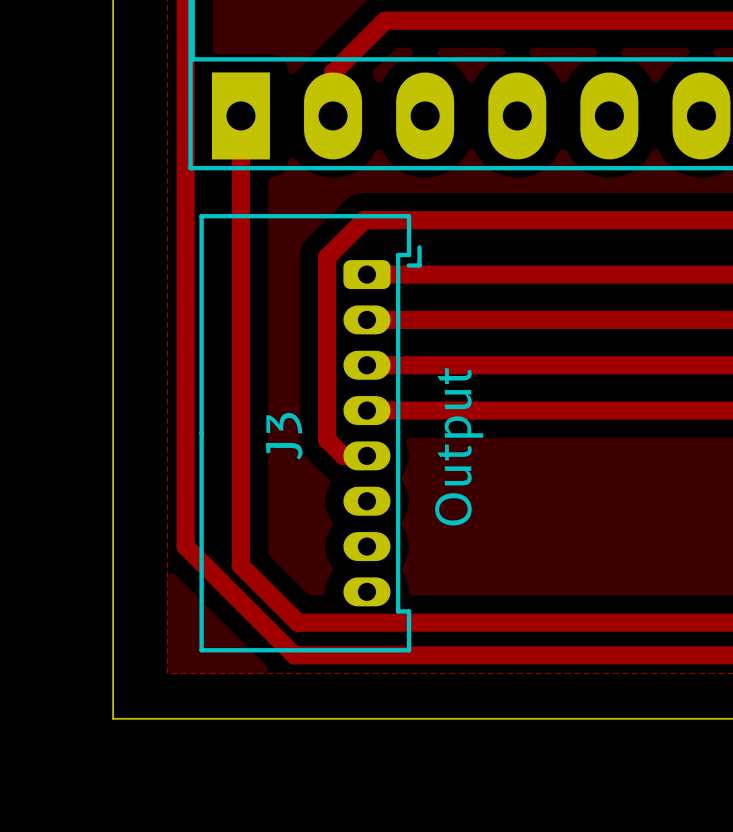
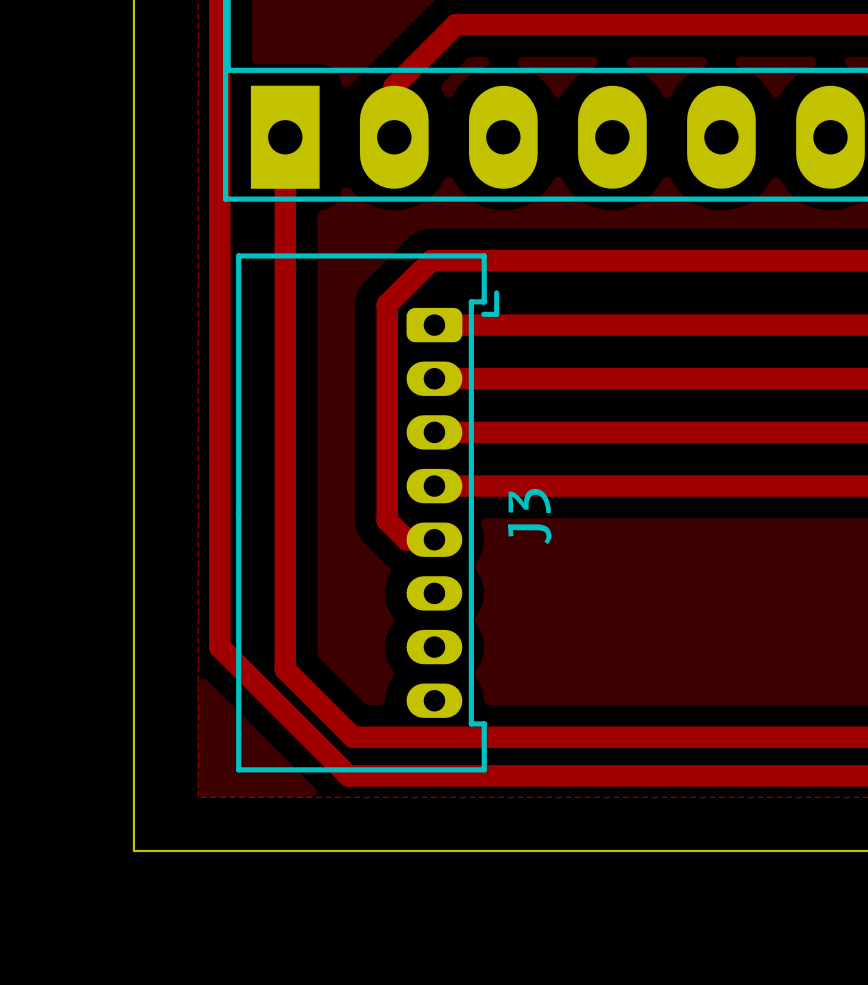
J3 name position: J3 (284, 436) -> J3 (529, 516)
text: Output (459, 446) -> none

